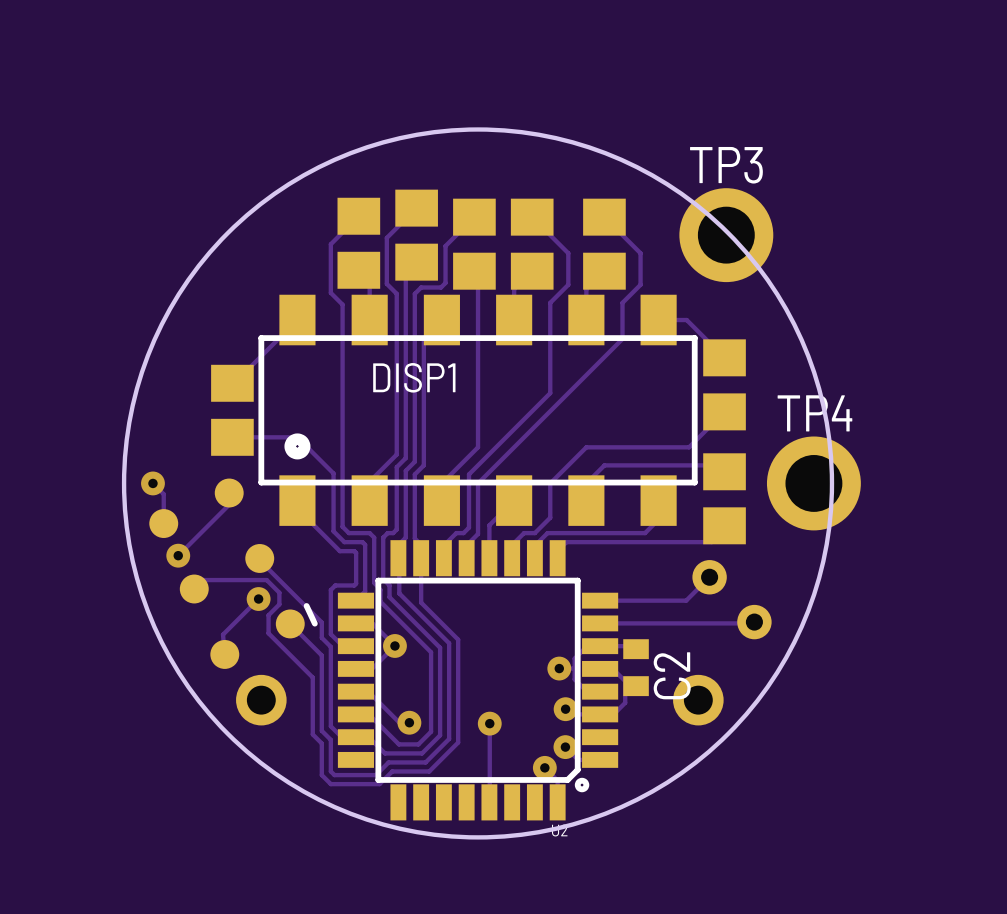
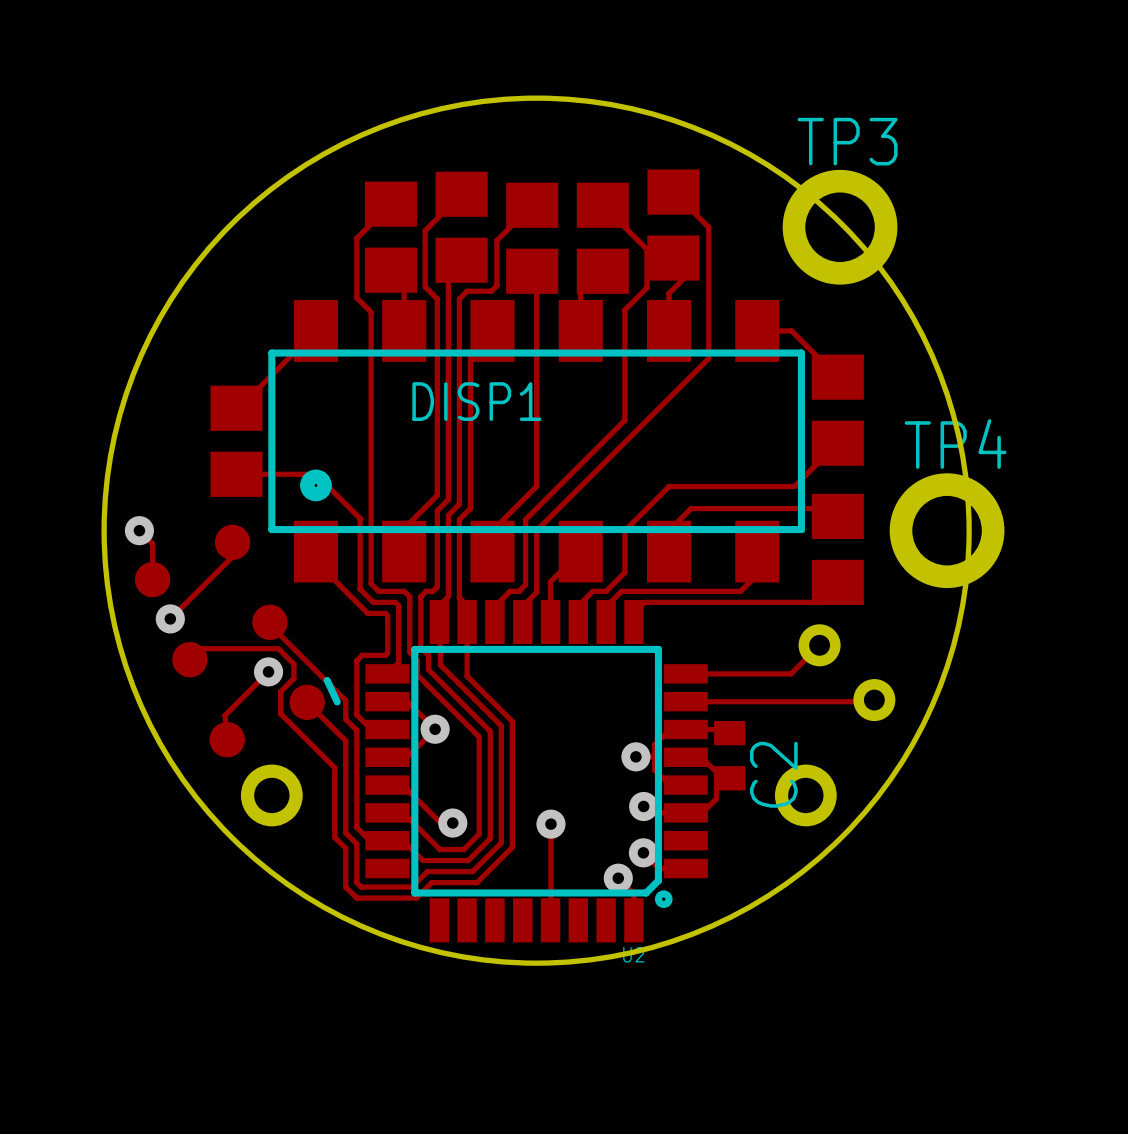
track: (604, 217) (640, 253) (640, 284) (622, 302) (622, 338) (618, 342) -> (673, 192) (708, 227) (708, 358)
part position: (604, 244) -> (673, 225)

